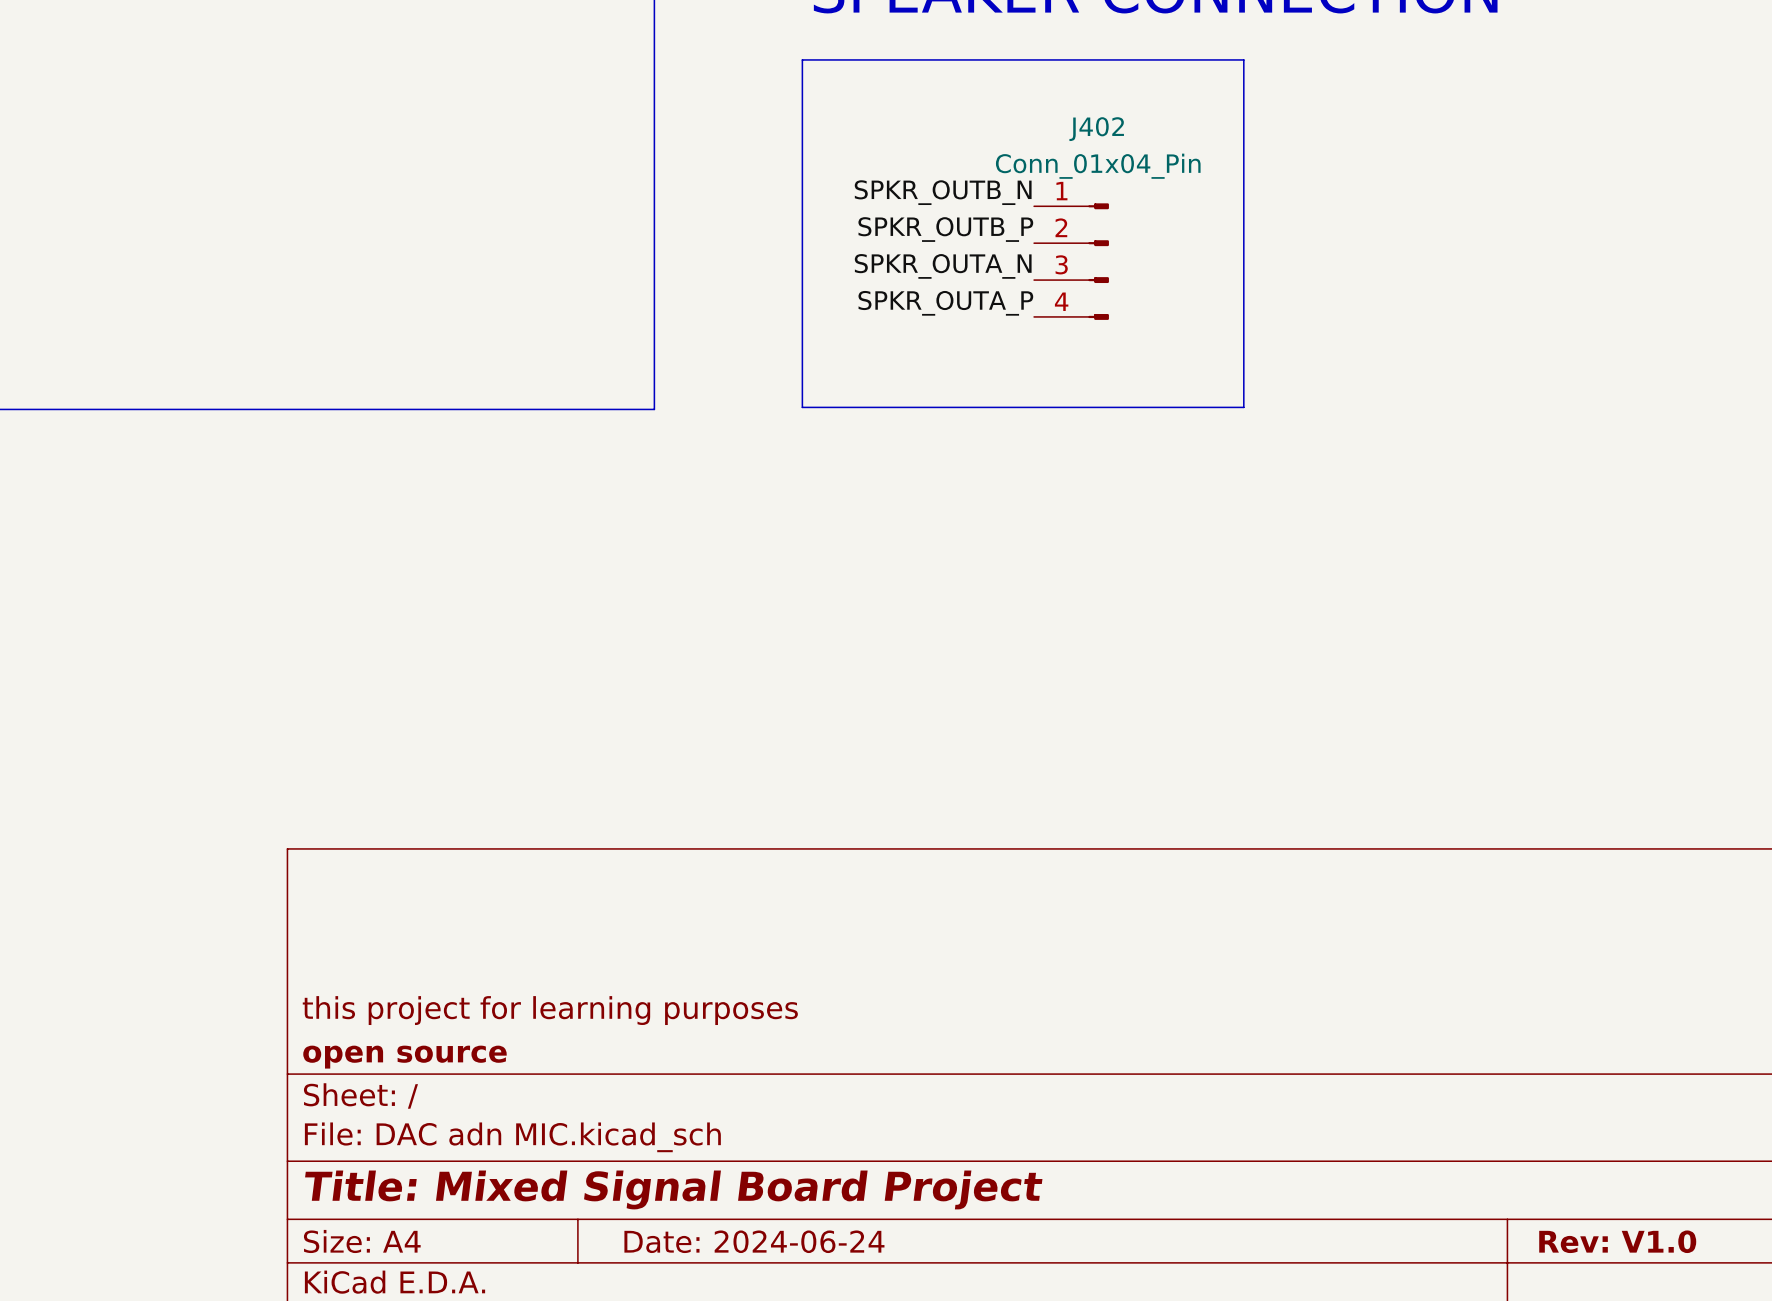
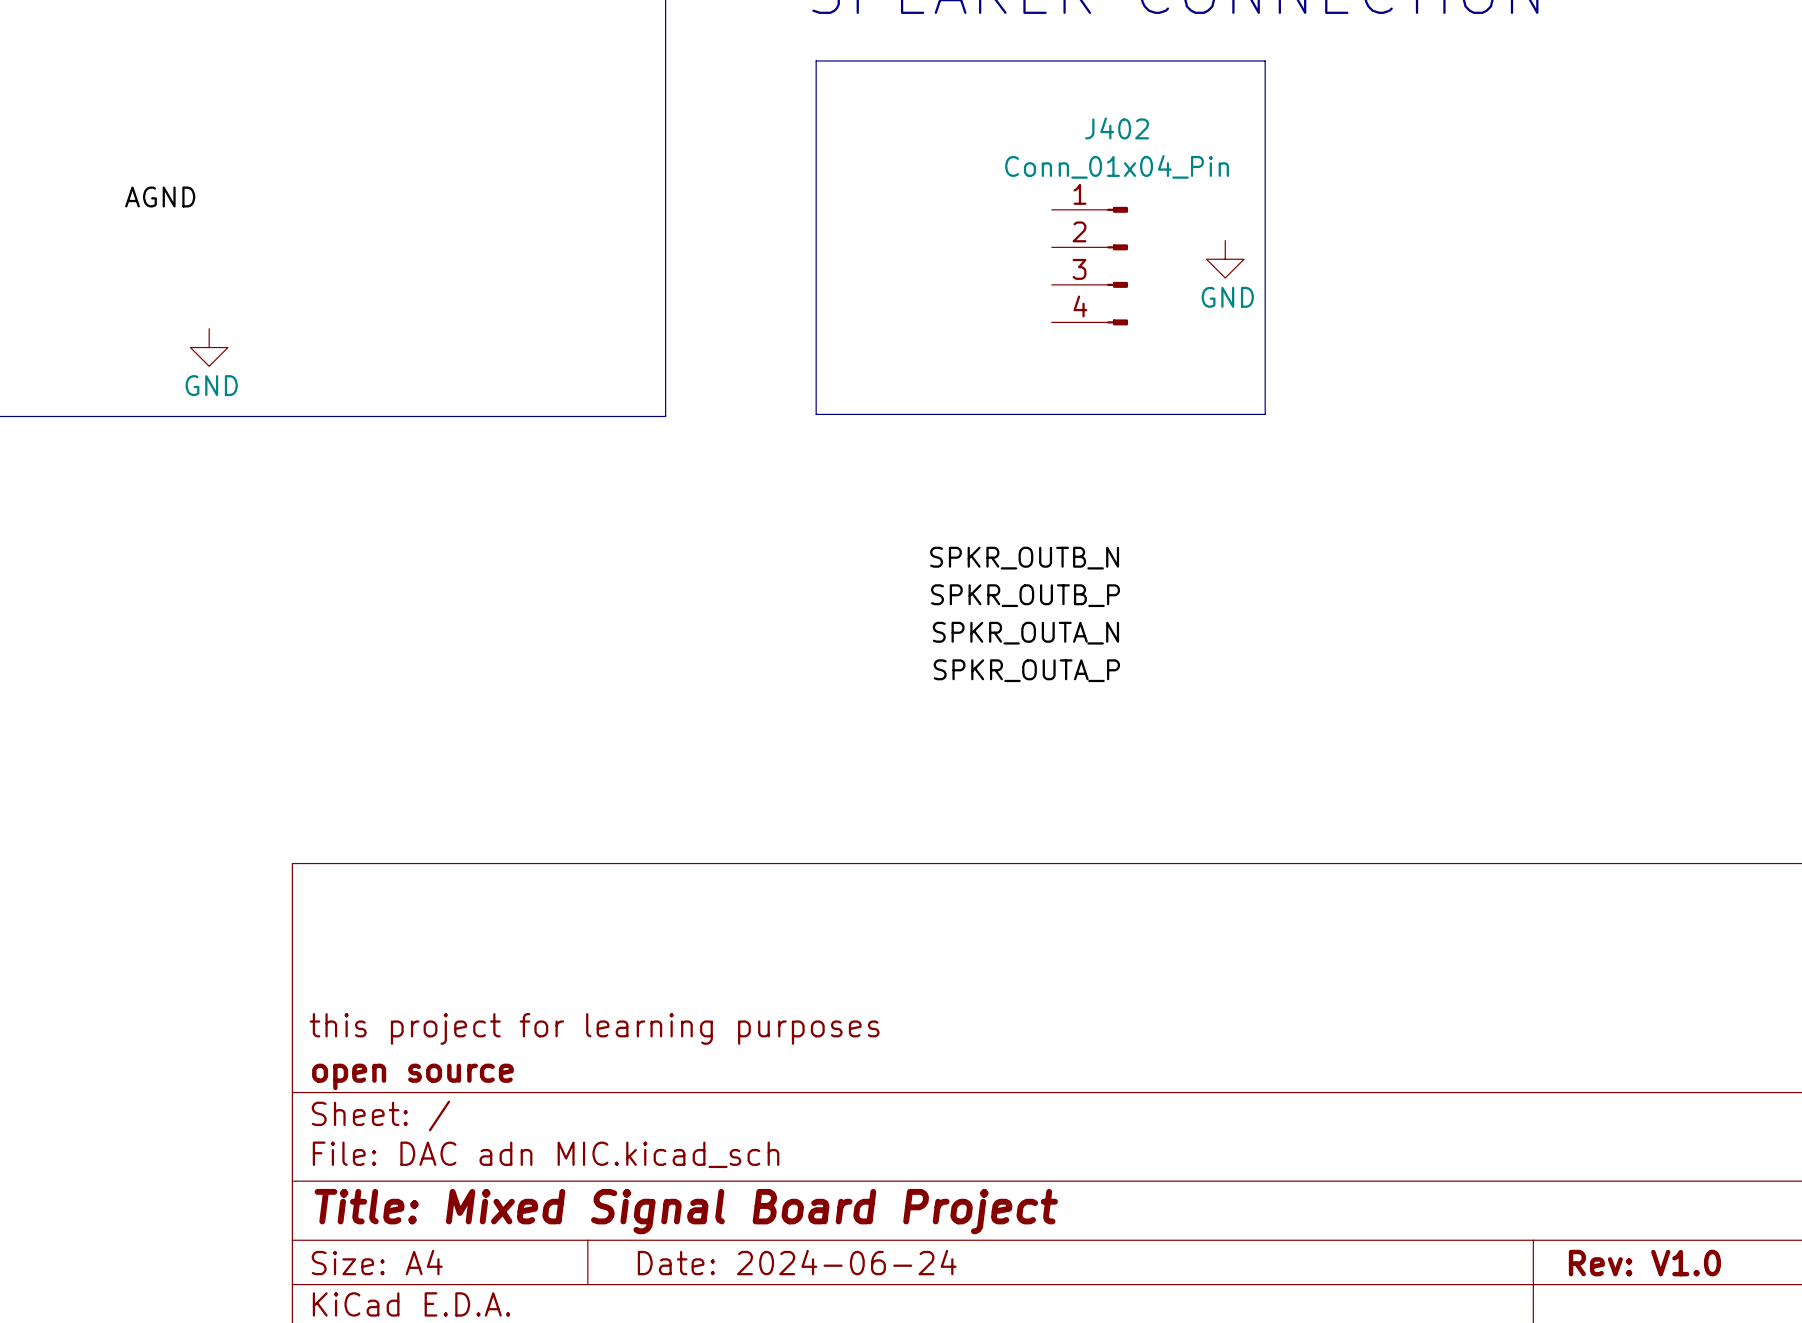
label: SPKR_OUTB_N (943, 192) -> none
label: none -> AGND (160, 197)
label: SPKR_OUTB_P (945, 229) -> none
power symbol: none -> GND (1225, 259)
label: SPKR_OUTA_N (943, 266) -> none
label: SPKR_OUTA_P (945, 303) -> none
power symbol: none -> GND (209, 347)
label: none -> SPKR_OUTB_N (1024, 558)
label: none -> SPKR_OUTB_P (1025, 595)
label: none -> SPKR_OUTA_N (1025, 633)
label: none -> SPKR_OUTA_P (1026, 670)

